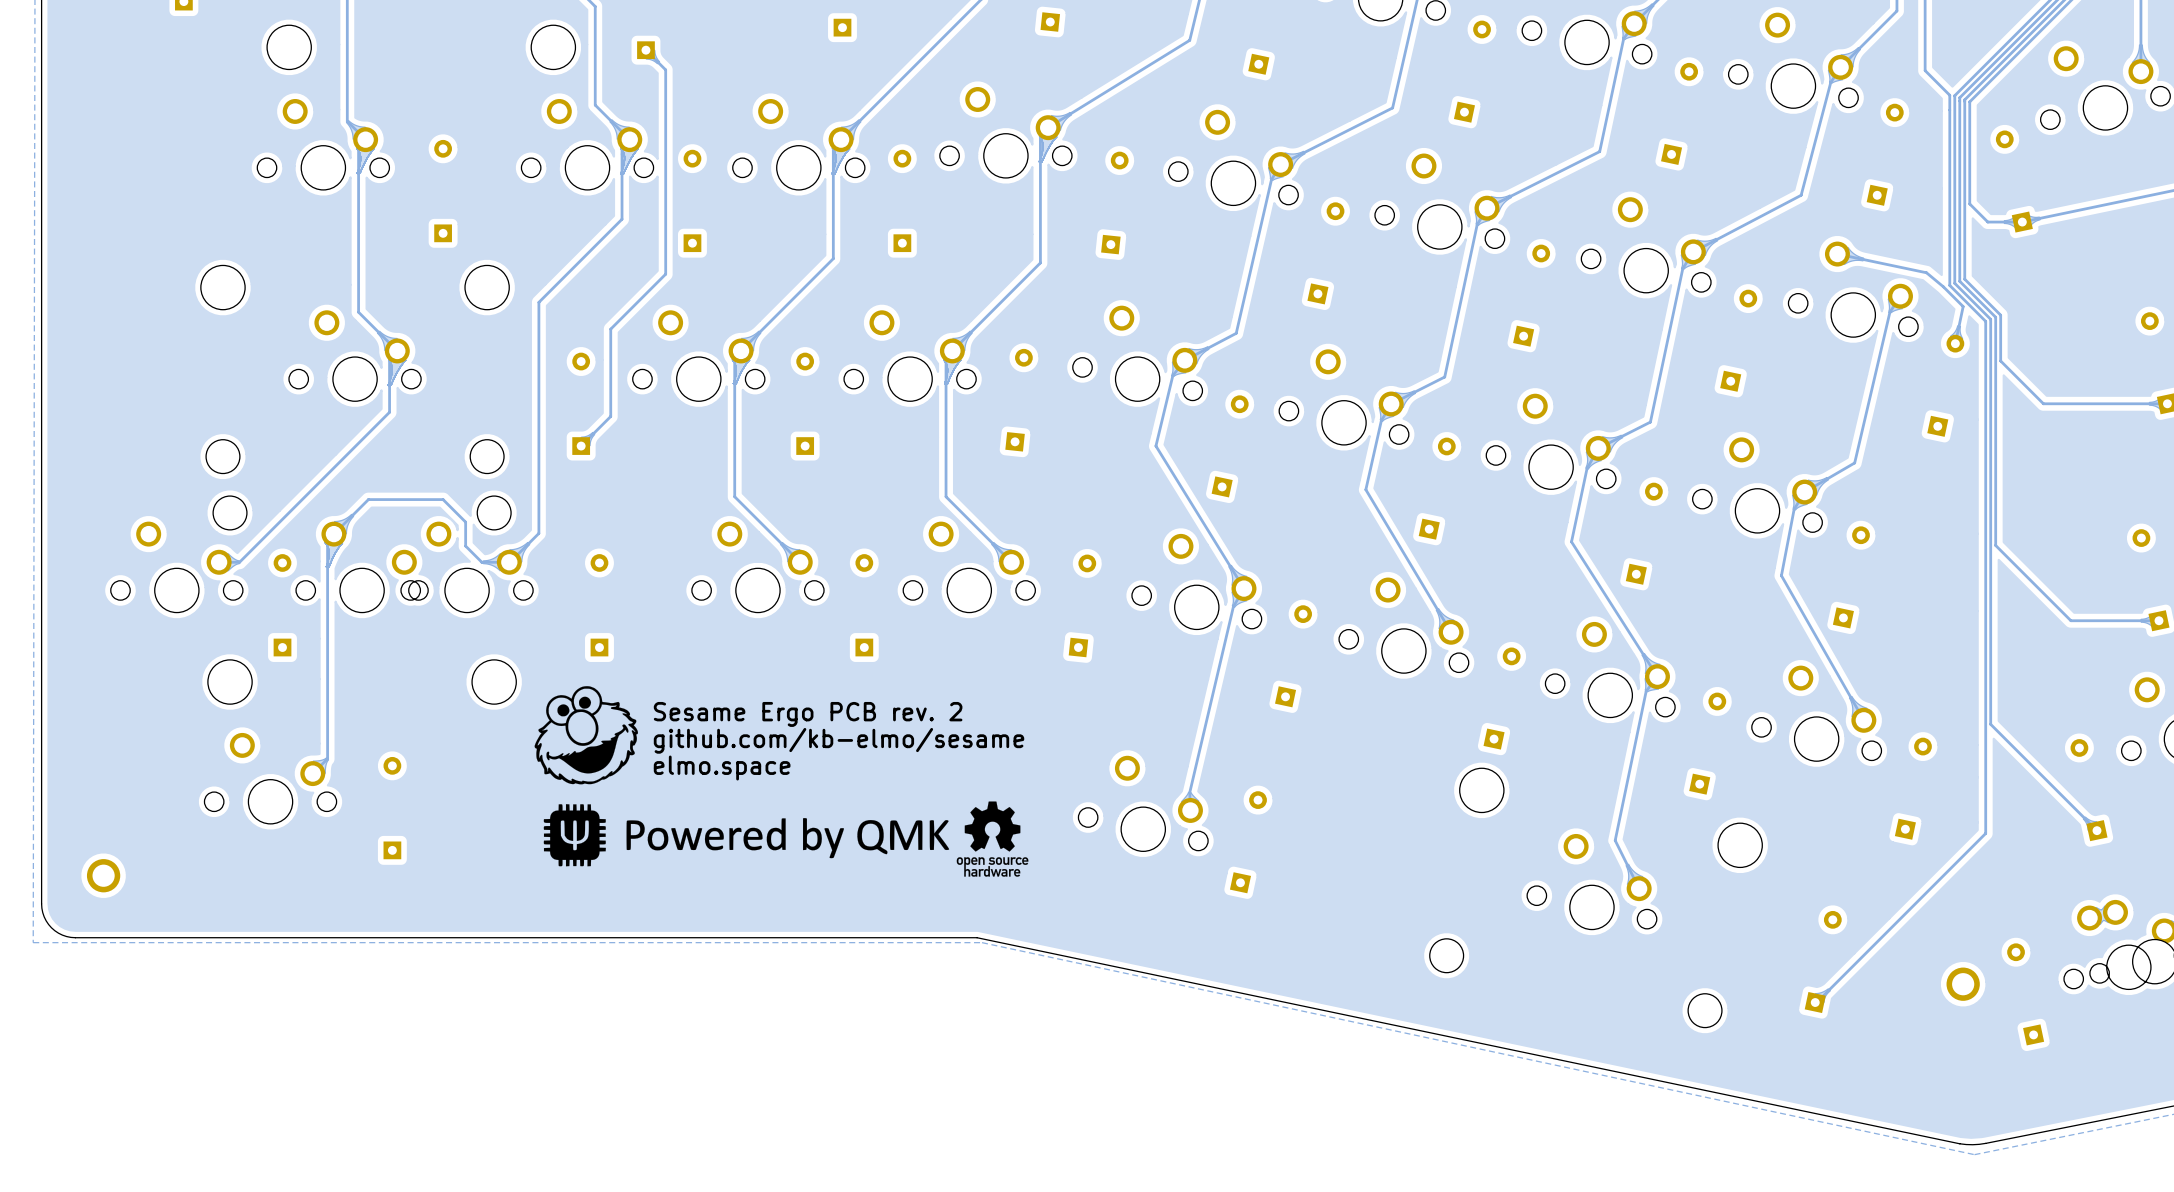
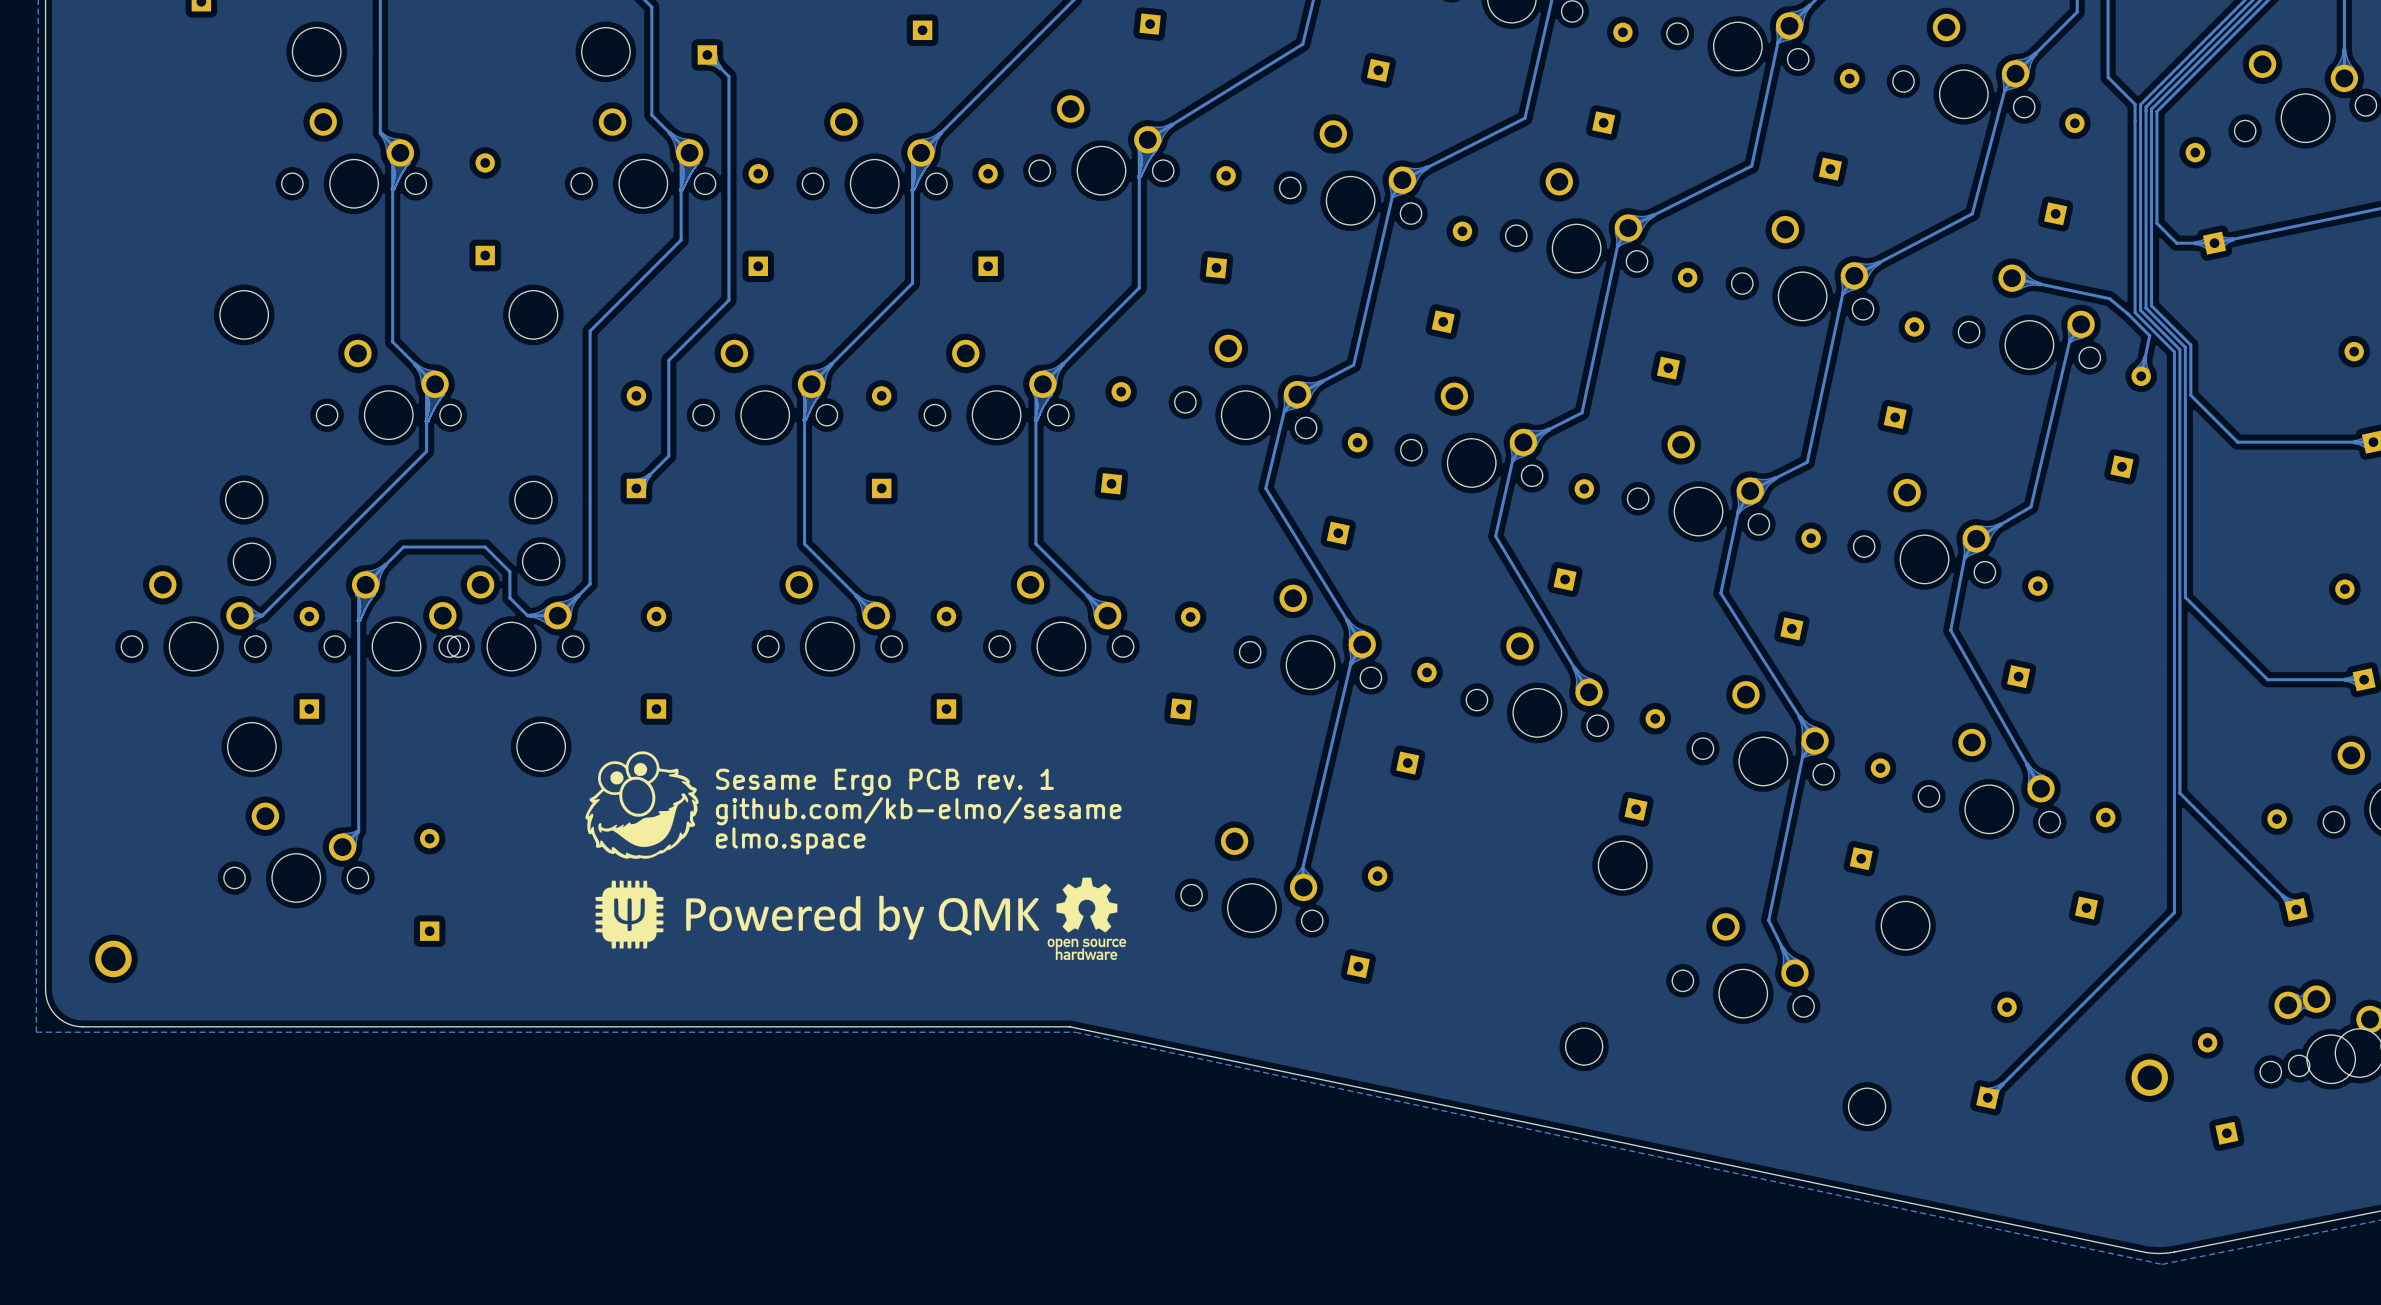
text: Sesame Ergo PCB rev. 2 (808, 714) -> Sesame Ergo PCB rev. 1 (884, 782)

